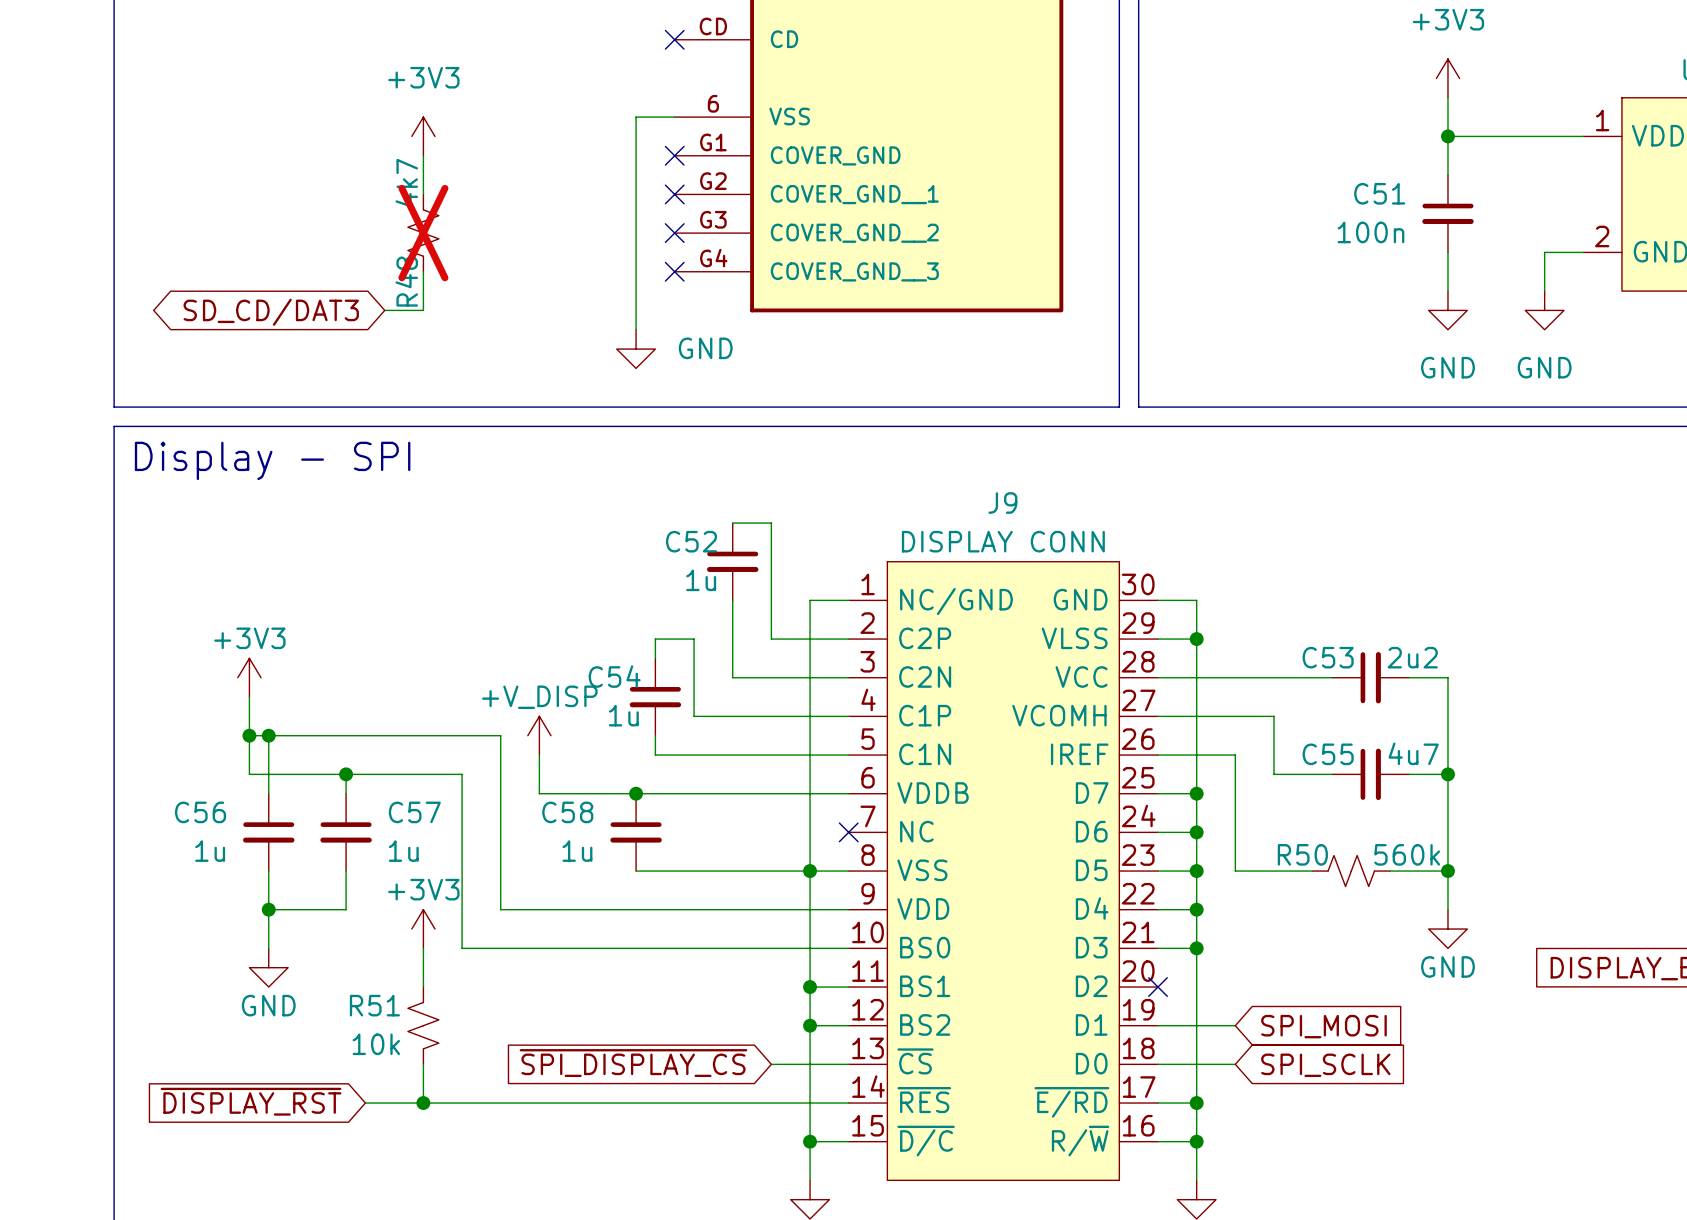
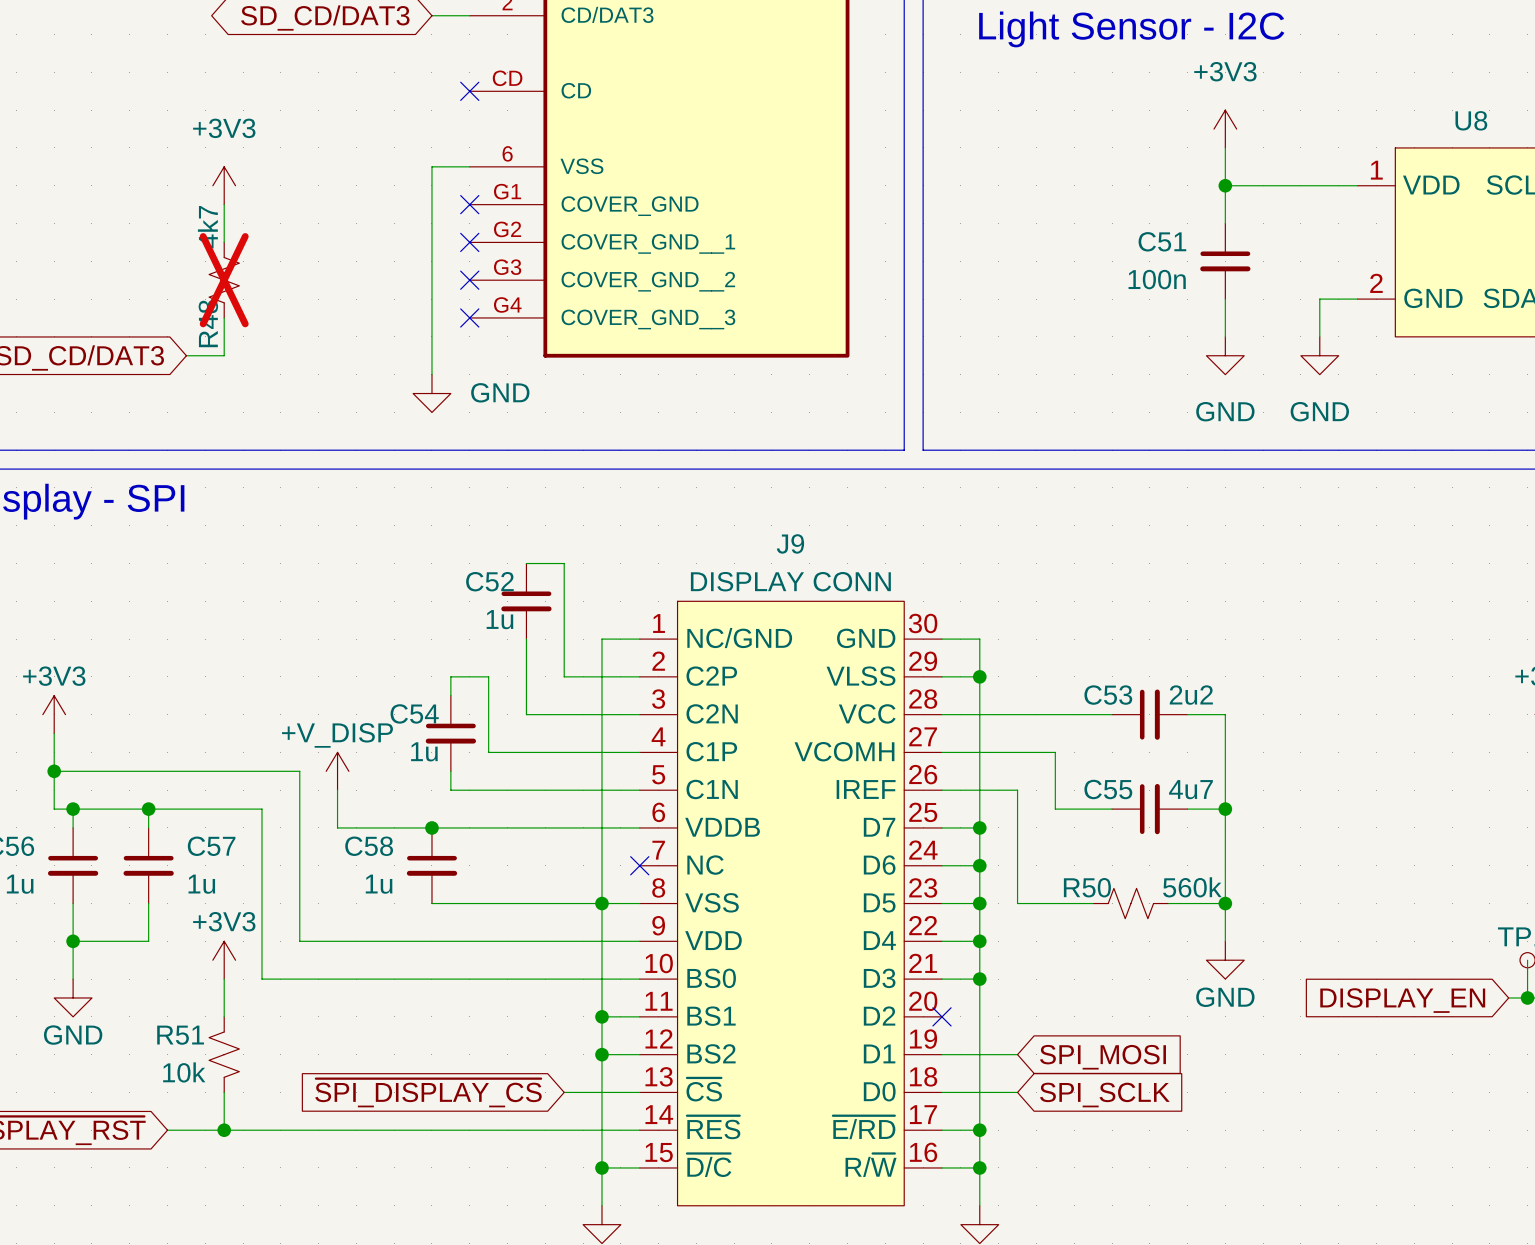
wire: (268, 735) (268, 774) -> none
junction position: (268, 735) -> (73, 809)

